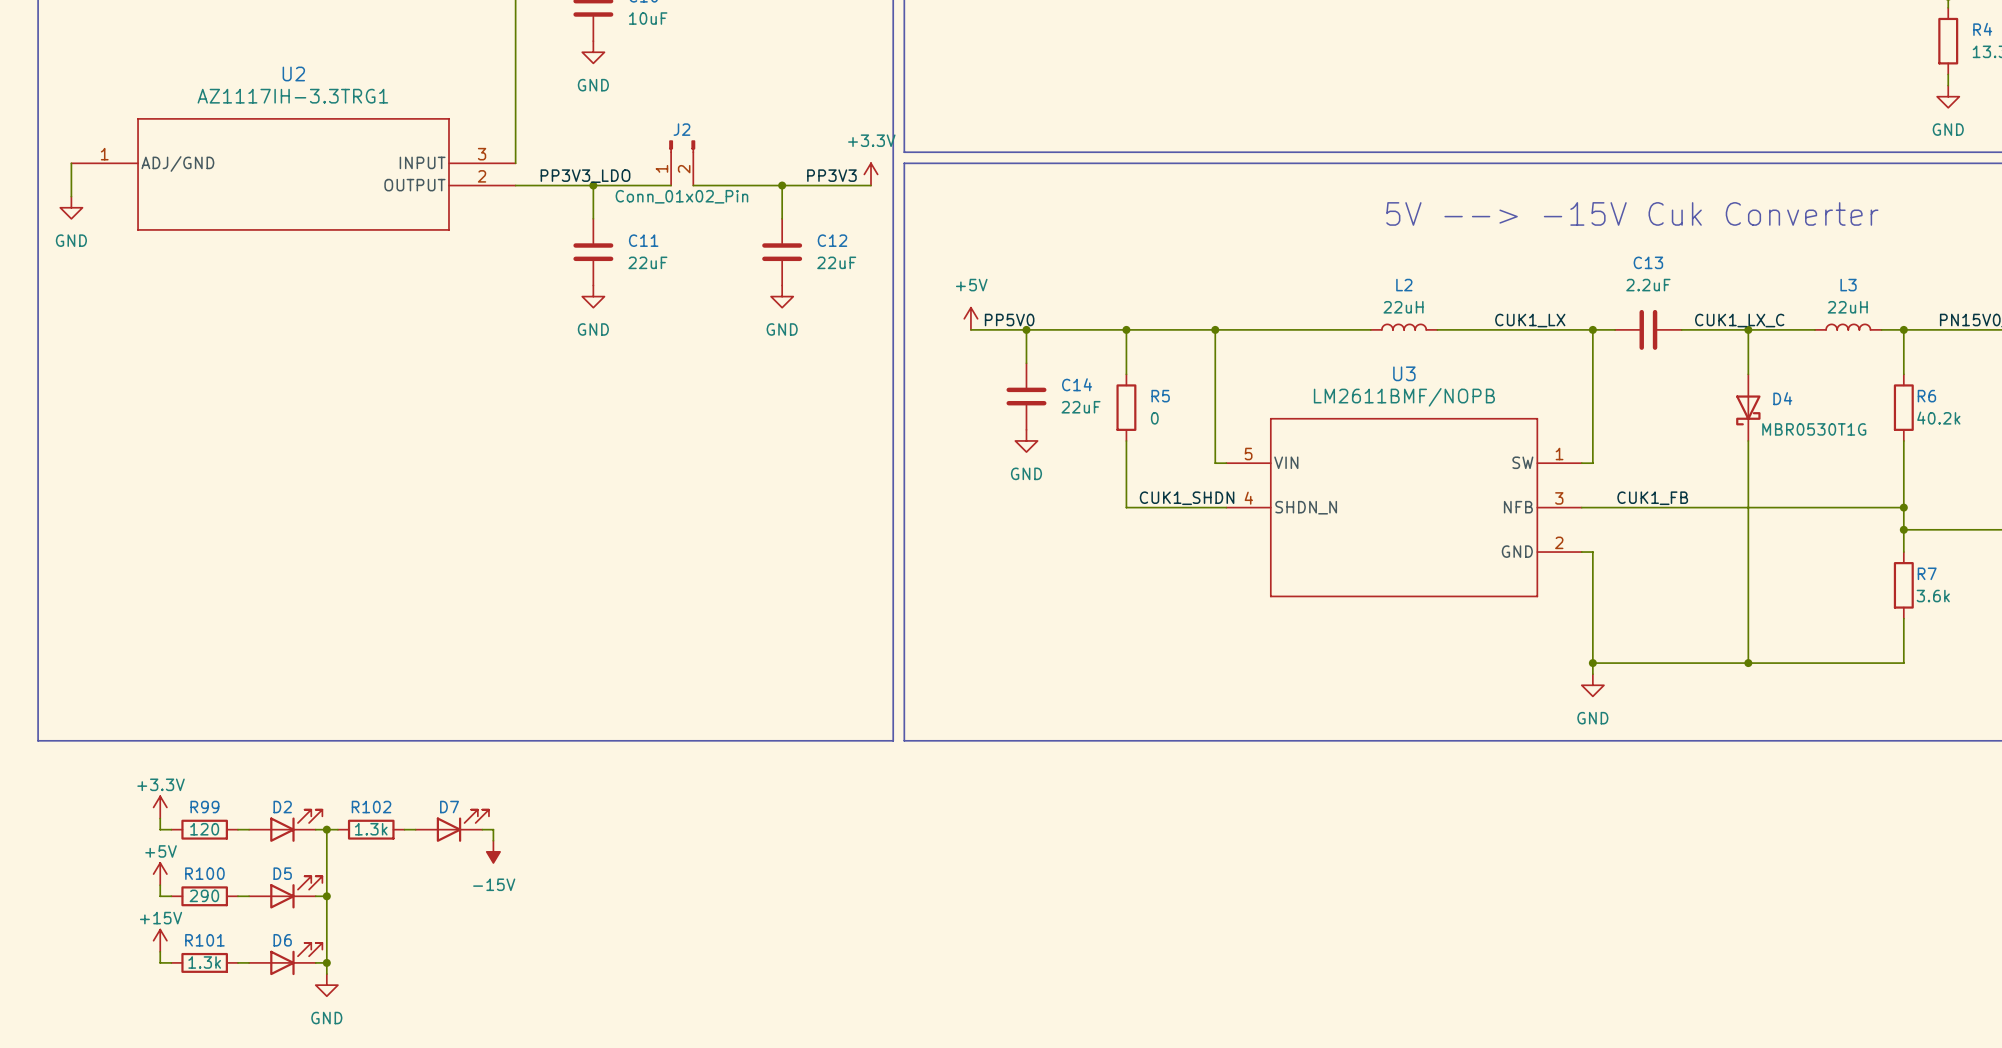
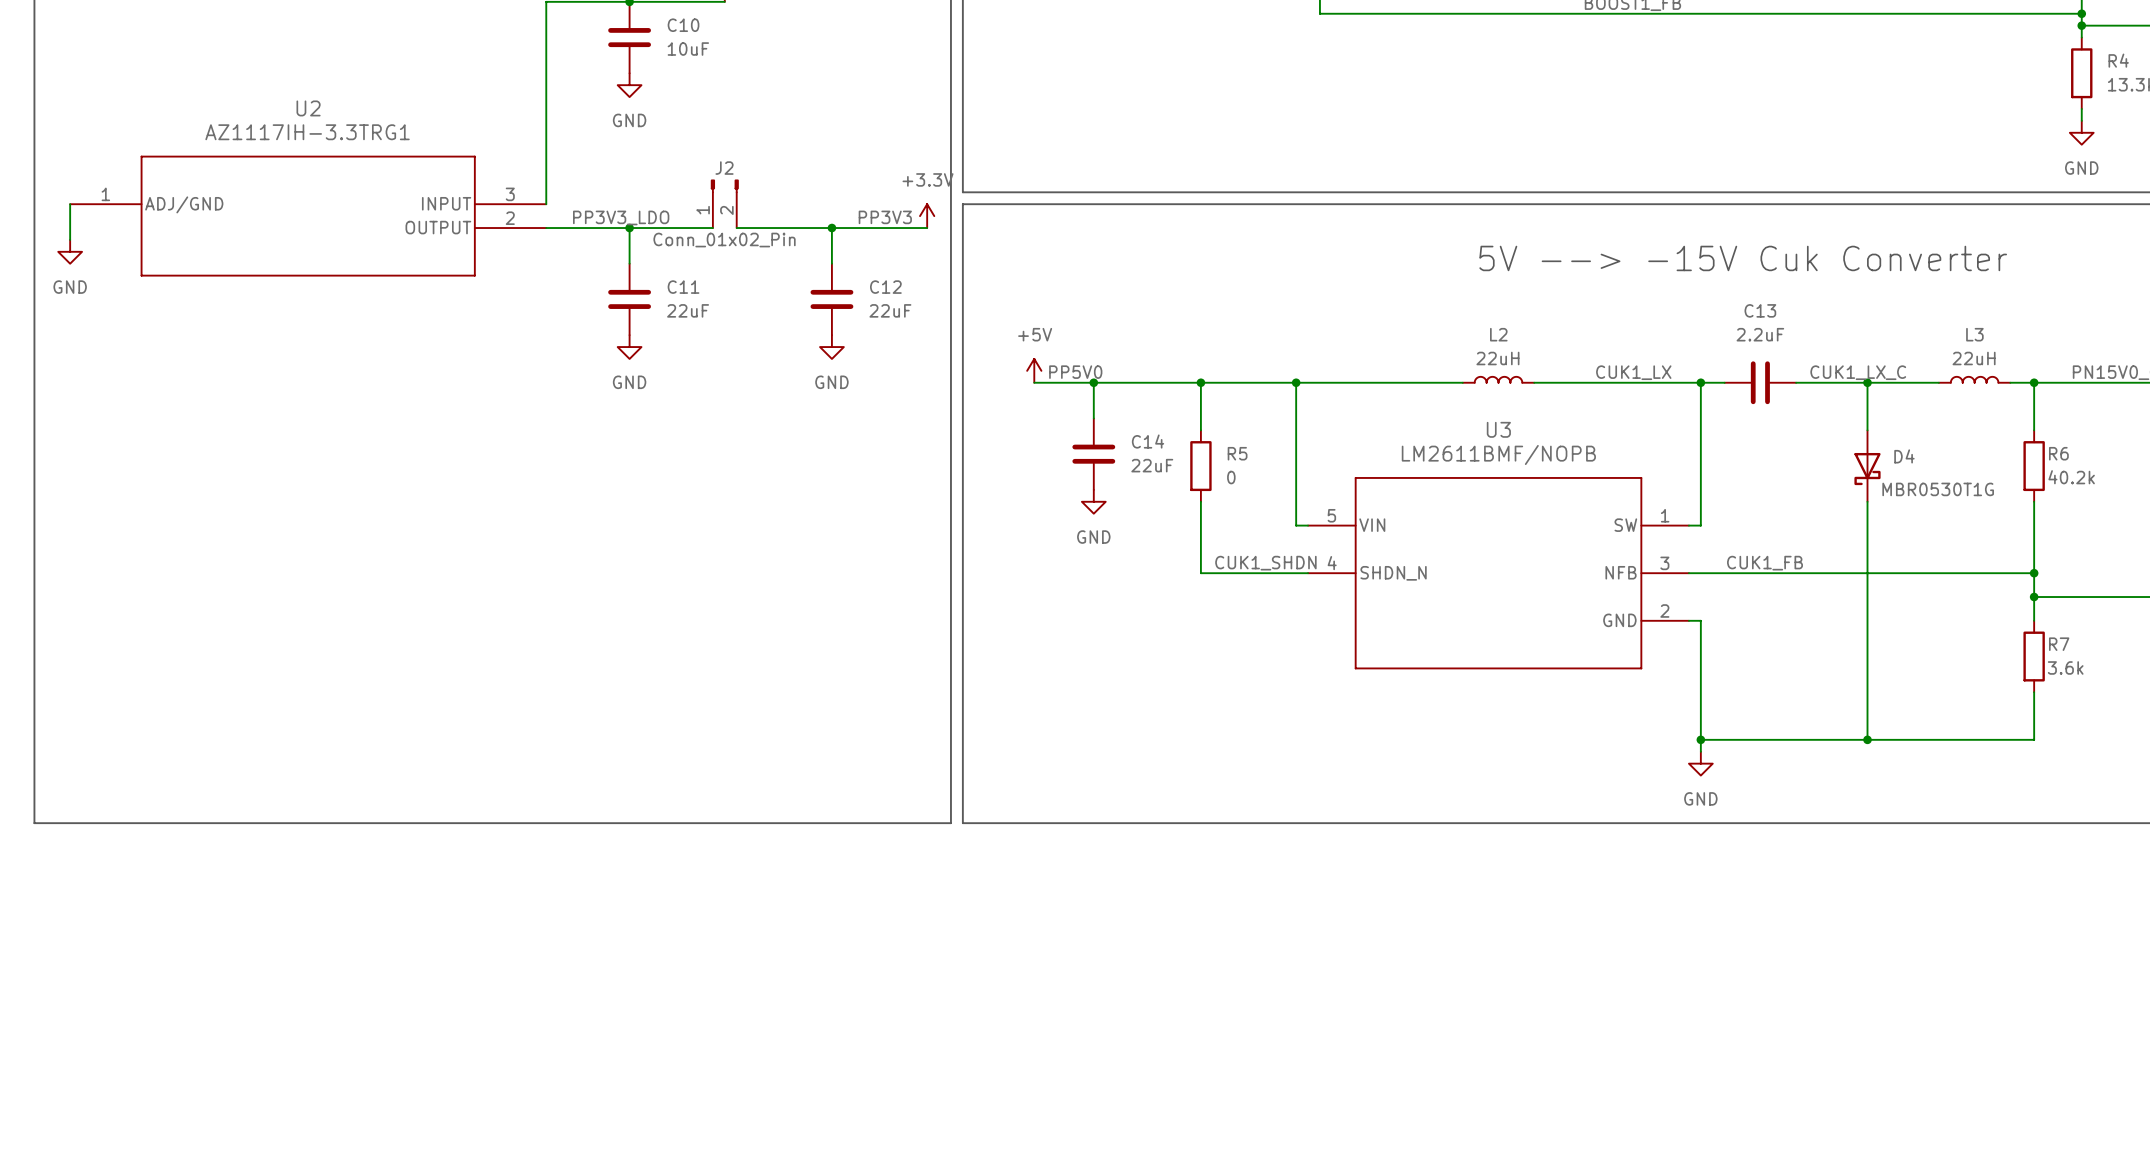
power symbol: +3.3V (160, 807) -> none
wire: (160, 818) (160, 829) (171, 829) -> none
D2: (285, 825) -> none
D7: (452, 825) -> none
R99: 120 (204, 829) -> none
wire: (237, 829) (249, 829) -> none
wire: (315, 829) (337, 829) -> none
wire: (326, 829) (326, 974) -> none
junction: (326, 829) -> none
R102: 1.3k (371, 829) -> none
wire: (404, 829) (415, 829) -> none
wire: (482, 829) (493, 829) (493, 840) -> none
power symbol: -15V (493, 851) -> none
power symbol: +5V (160, 874) -> none
wire: (160, 885) (160, 896) (171, 896) -> none
D5: (285, 892) -> none
R100: 290 (204, 896) -> none
wire: (237, 896) (249, 896) -> none
wire: (315, 896) (326, 896) -> none
junction: (326, 896) -> none
power symbol: +15V (160, 940) -> none
wire: (160, 951) (160, 962) (171, 962) -> none
D6: (285, 959) -> none
R101: 1.3k (204, 962) -> none
wire: (237, 962) (249, 962) -> none
wire: (315, 962) (326, 962) -> none
junction: (326, 962) -> none
power symbol: GND (326, 985) -> none

